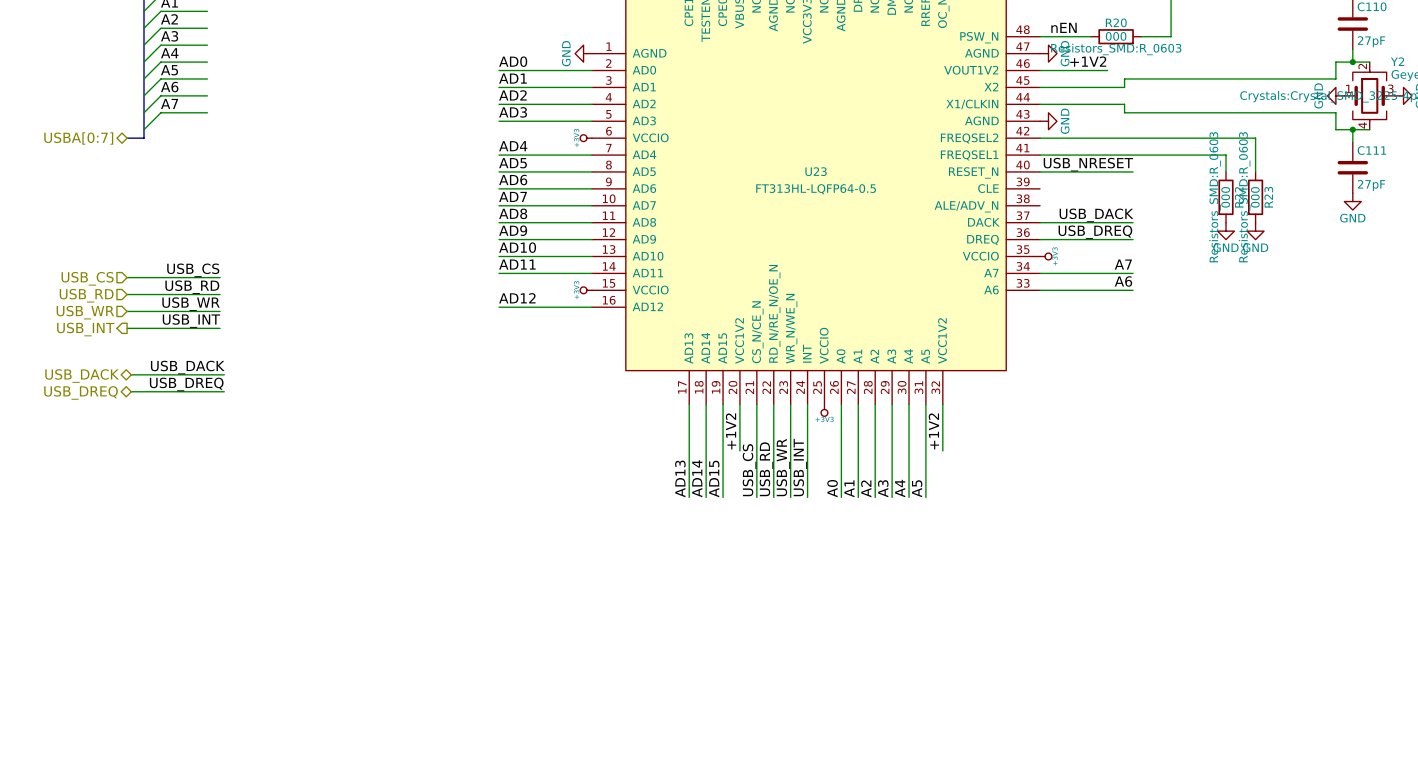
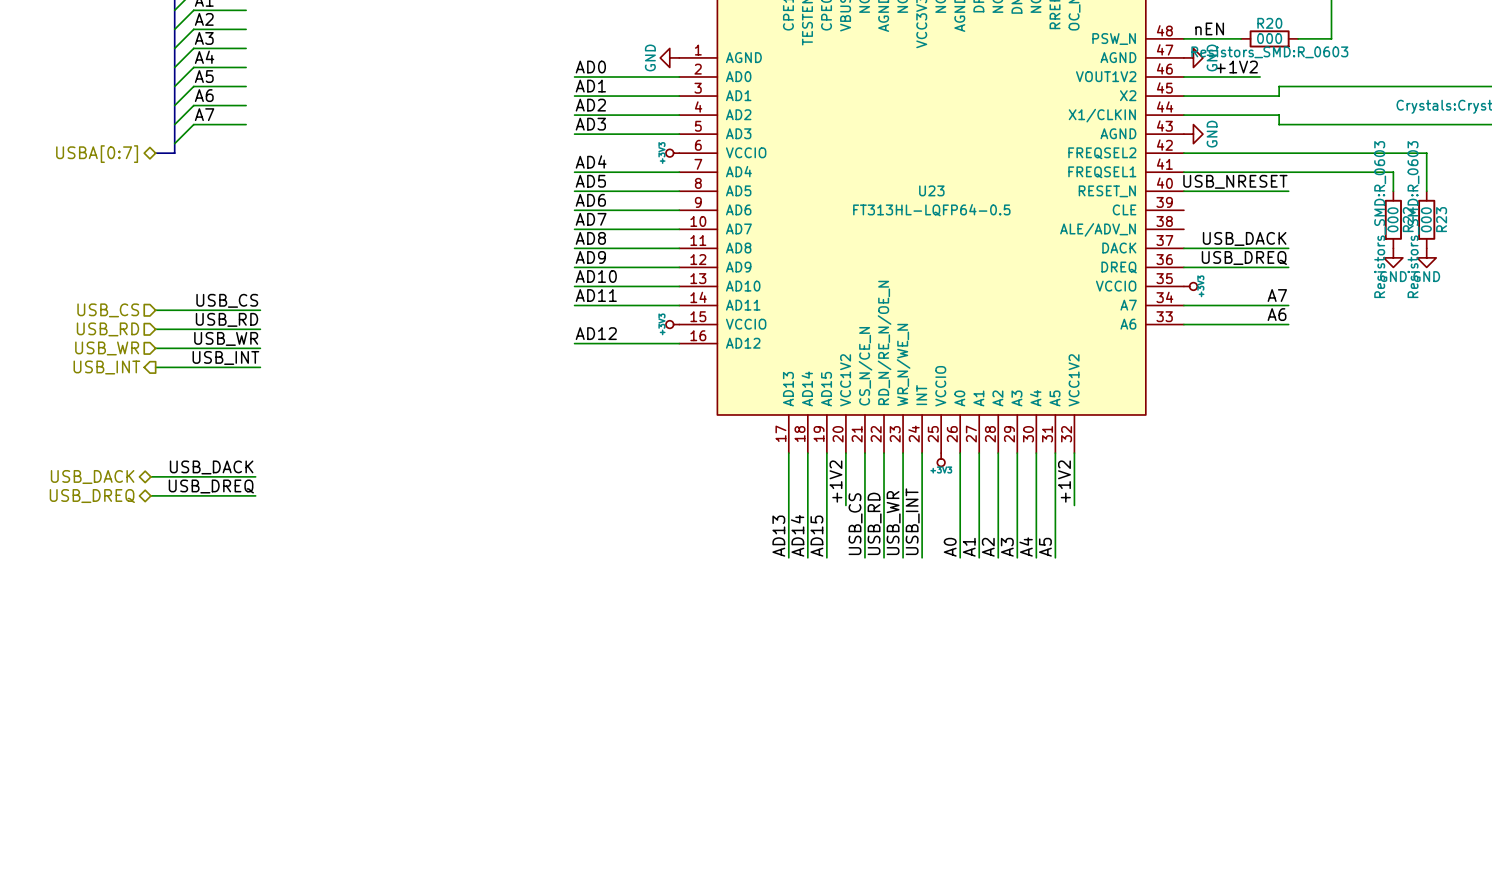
label position: USB_DACK (187, 367) -> USB_DACK (211, 467)
wire: (131, 374) (224, 374) -> (150, 495) (255, 495)
hierarchical label position: USB_DACK (82, 376) -> USB_DACK (92, 476)
label position: USB_DREQ (186, 384) -> USB_DREQ (211, 486)
wire: (131, 391) (224, 391) -> (150, 476) (255, 476)
hierarchical label position: USB_DREQ (81, 392) -> USB_DREQ (92, 496)

